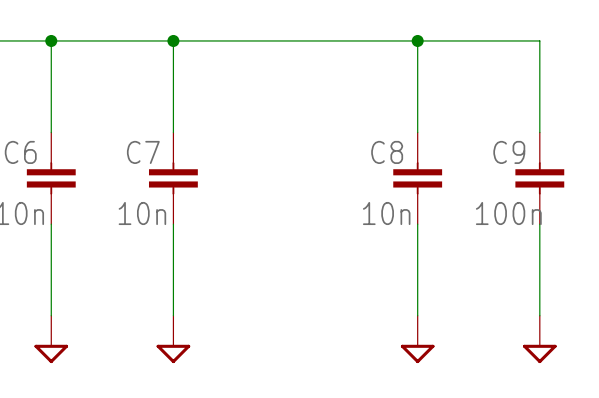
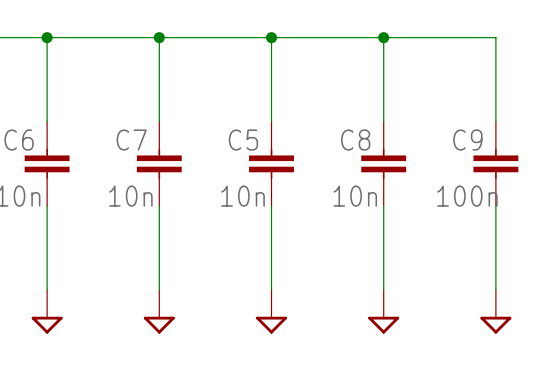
wire: none -> (271, 37) (271, 121)
junction: none -> (271, 37)
C5: none -> 10n (271, 163)
wire: none -> (271, 205) (271, 290)
power symbol: none -> (271, 311)

